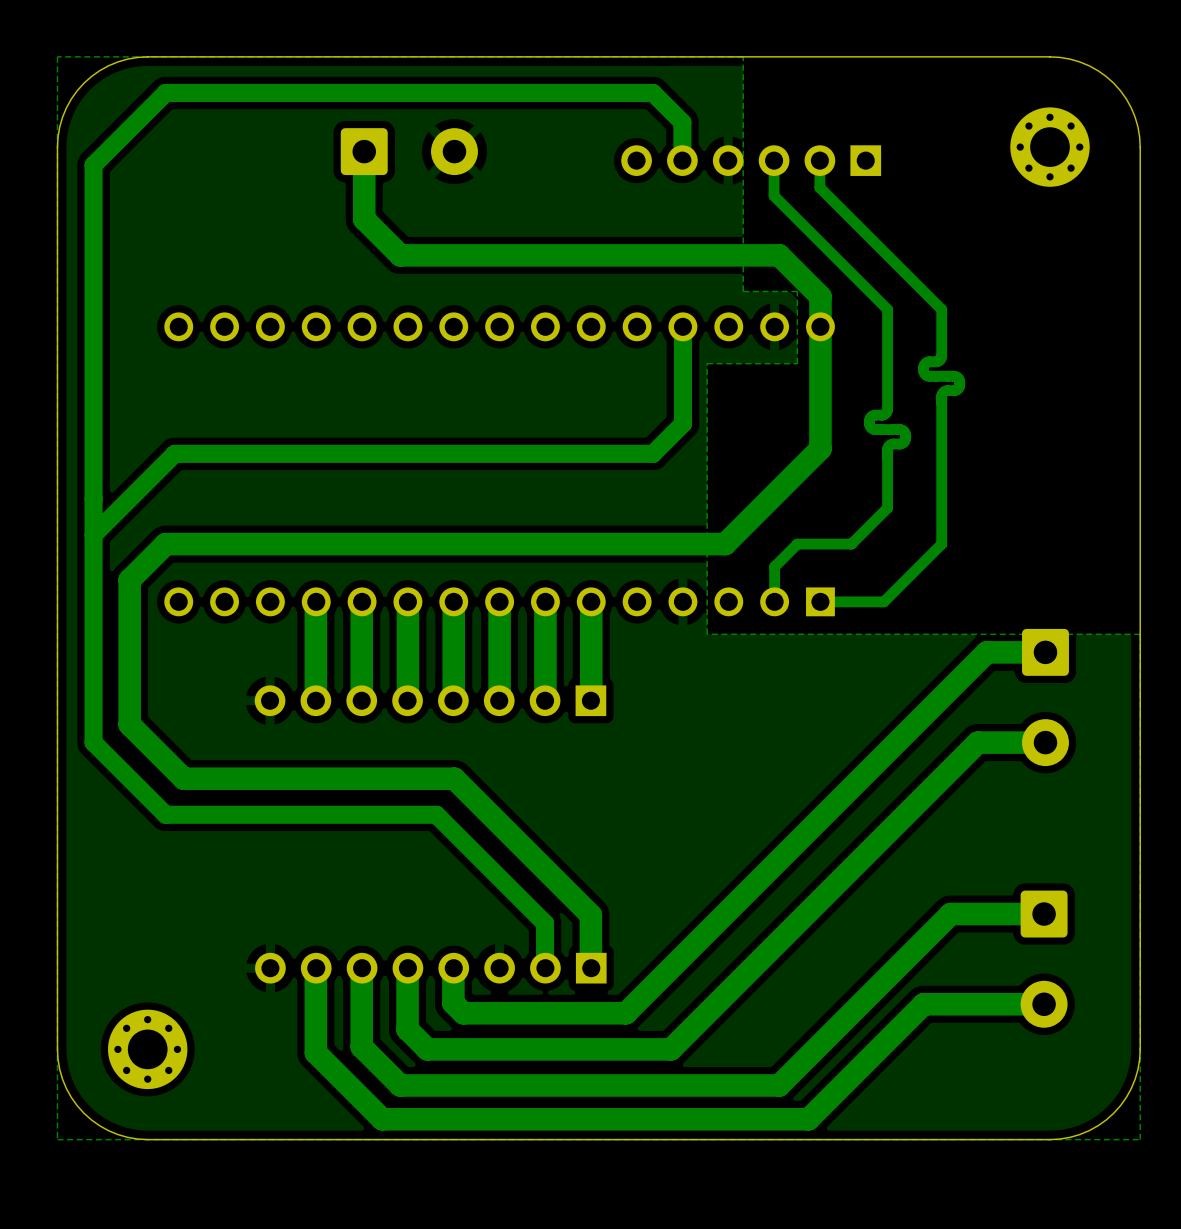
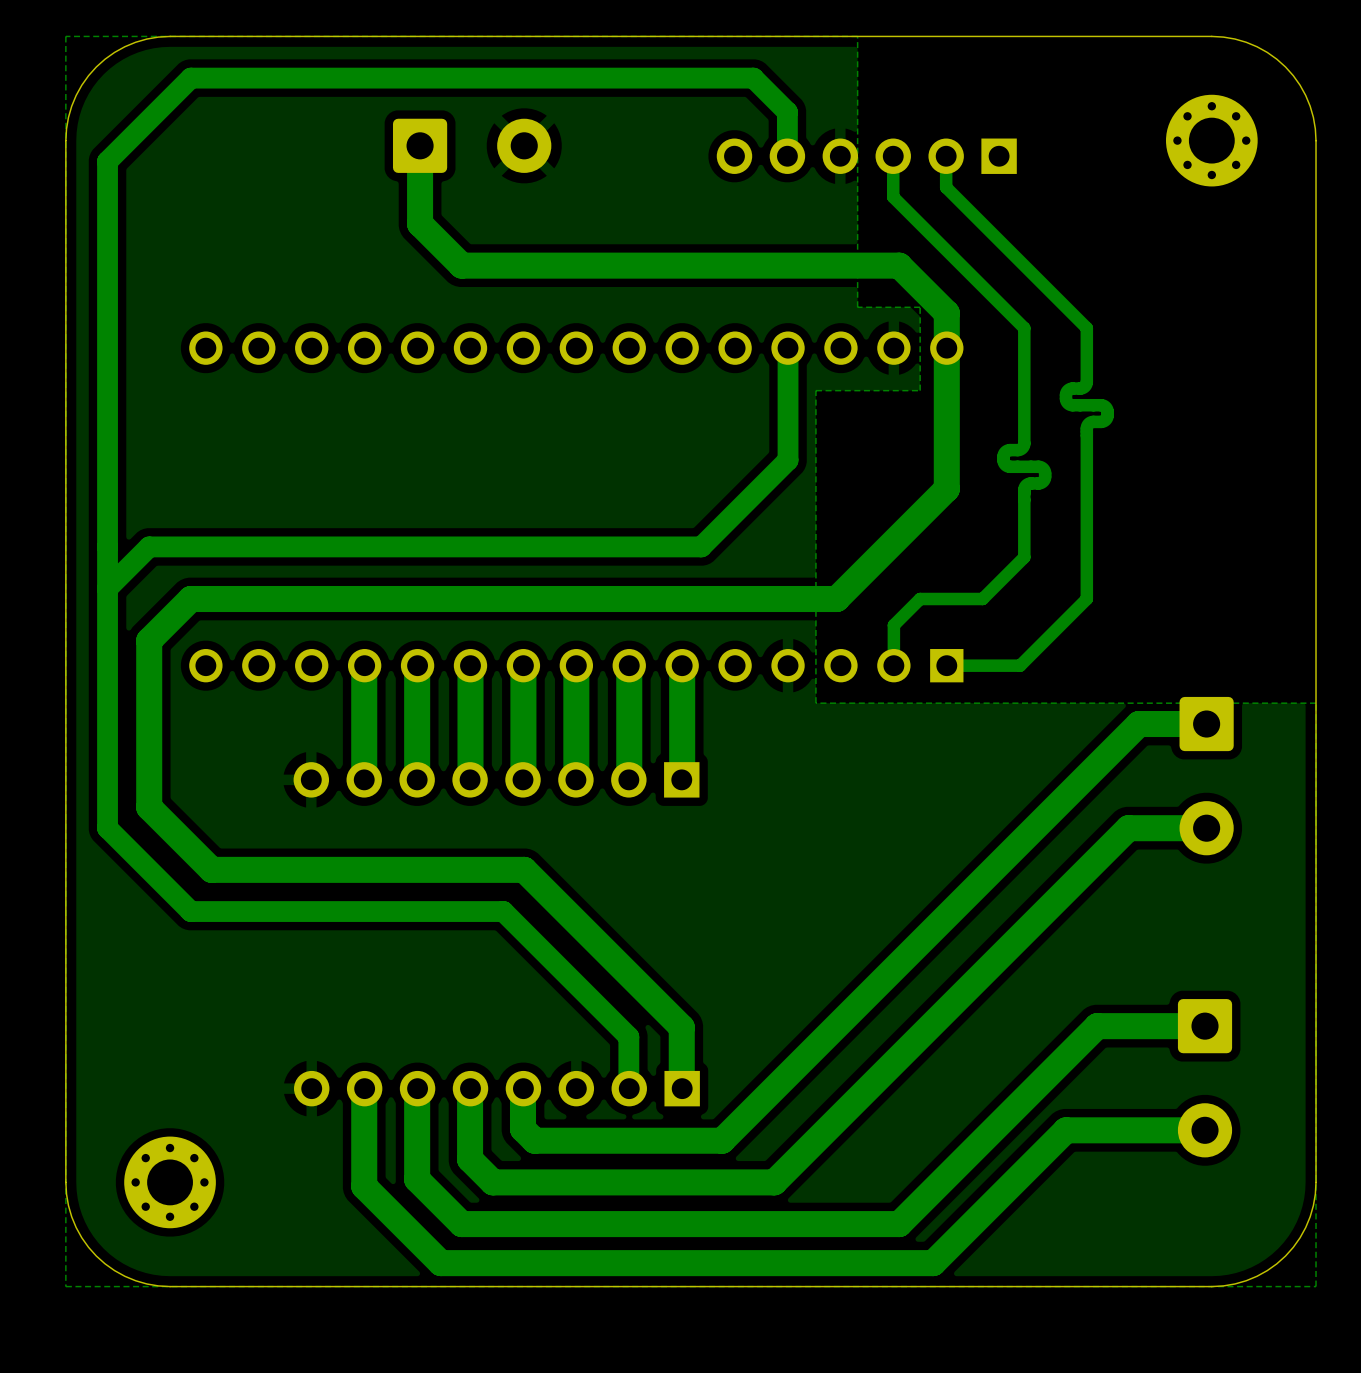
track: (652, 453) (174, 453) (129, 498) -> (753, 494) (701, 546) (149, 546)

